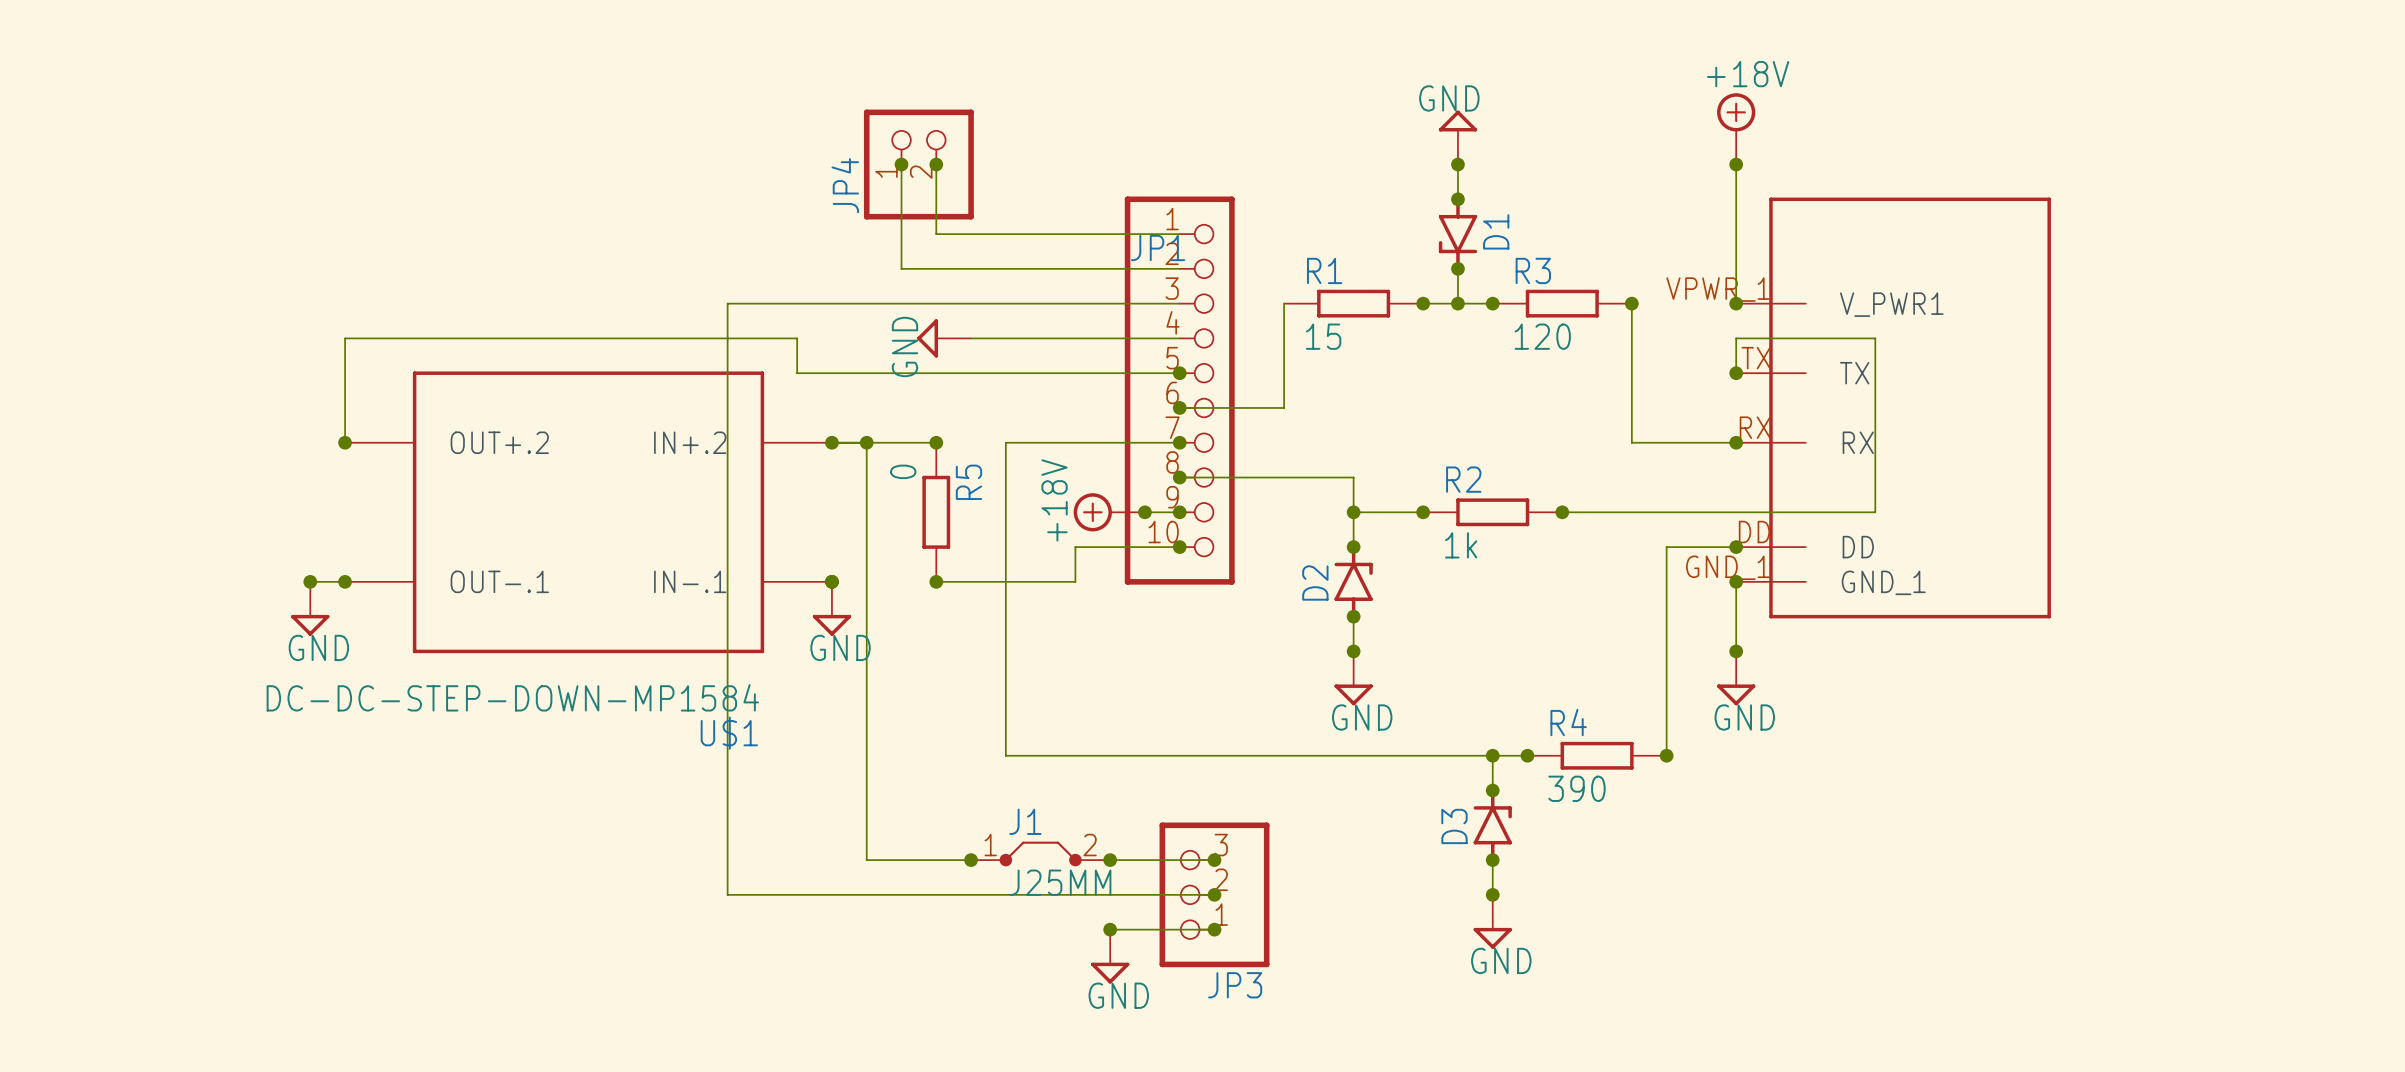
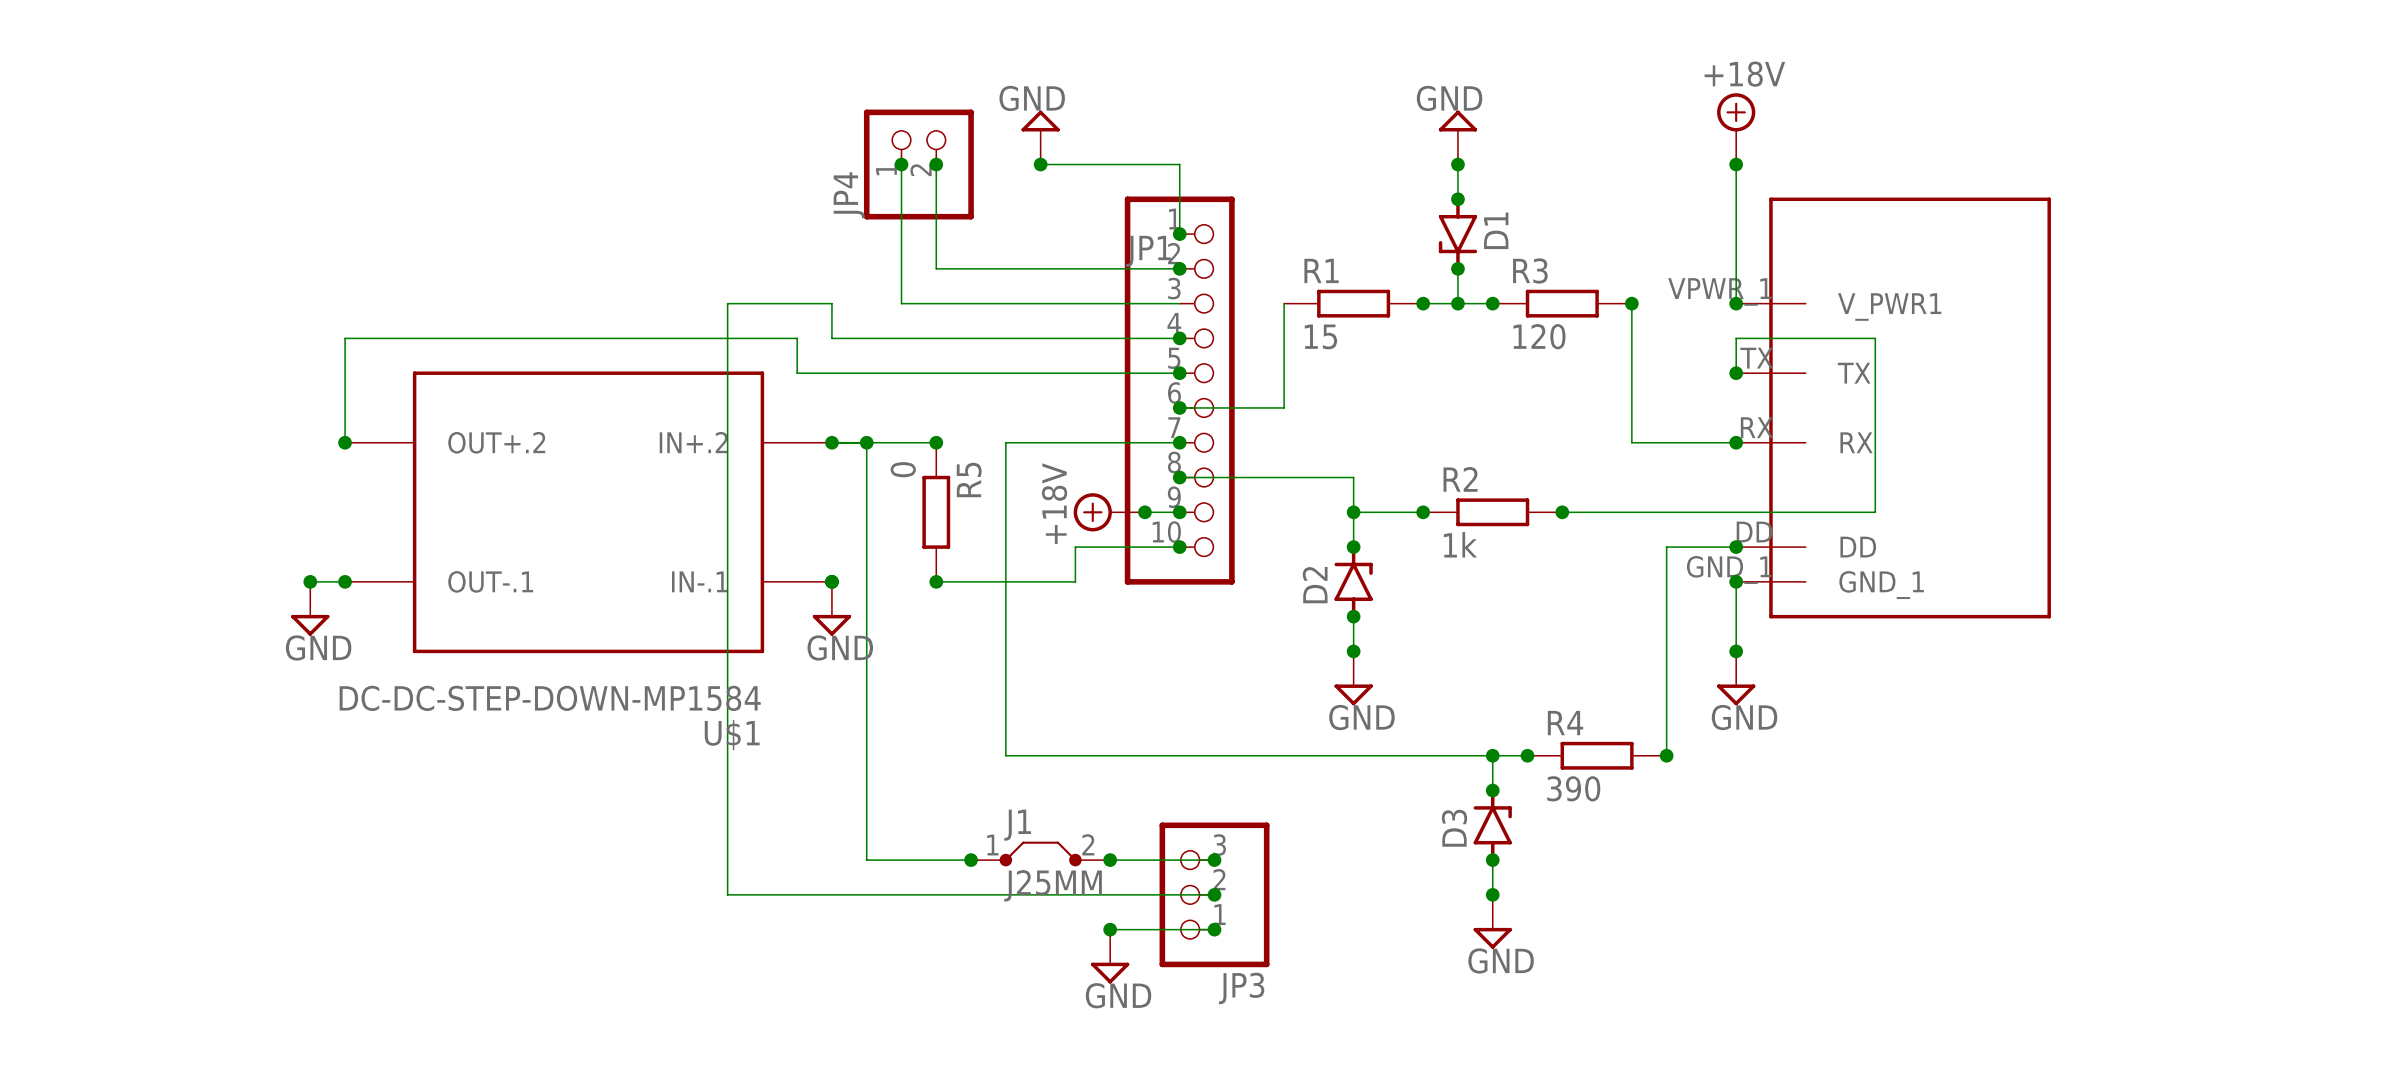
junction: none -> (1040, 164)
wire: (936, 234) (1179, 234) -> (1040, 164) (1179, 164) (1179, 234)
junction: none -> (1179, 234)
wire: (901, 268) (936, 268) -> (936, 234) (936, 268)
junction: none -> (1179, 268)
wire: (831, 303) (901, 303) -> (901, 268) (901, 303)
wire: none -> (831, 303) (831, 338) (971, 338)
power symbol rotation: 0° (927, 338) -> 90° clockwise (1040, 121)
power symbol position: GND (944, 338) -> GND (1040, 137)
junction: none -> (1179, 338)

